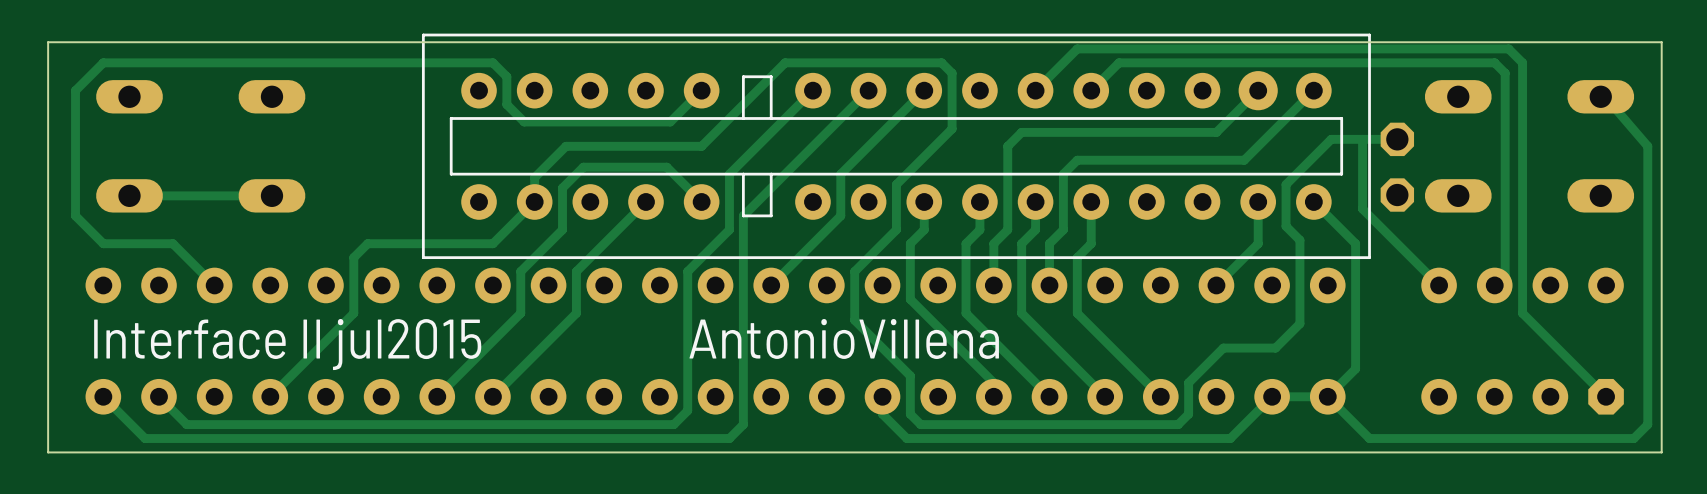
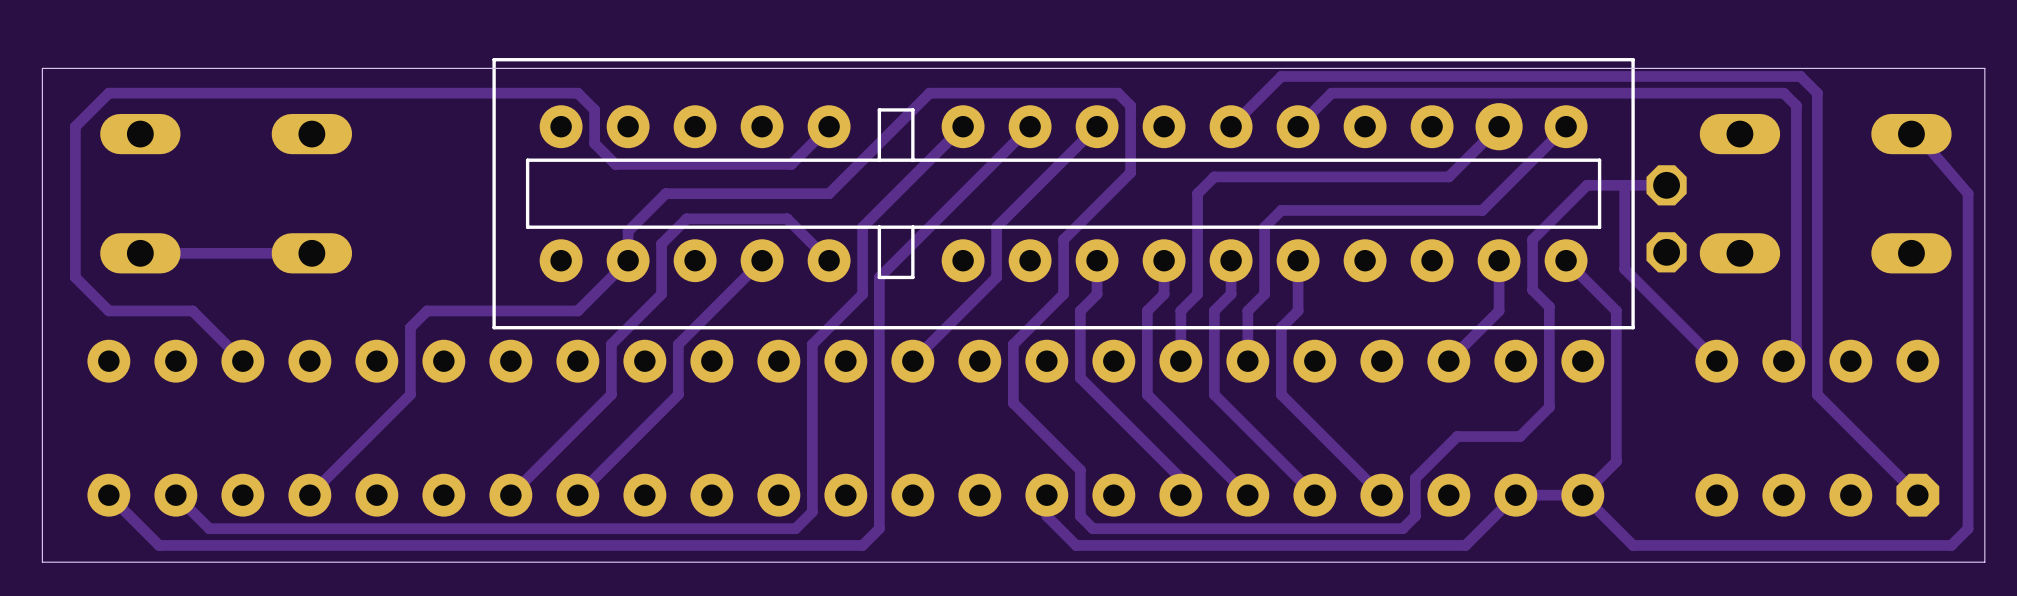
text: AntonioVillena (844, 339) -> none
text: Interface II jul2015 (287, 344) -> none

